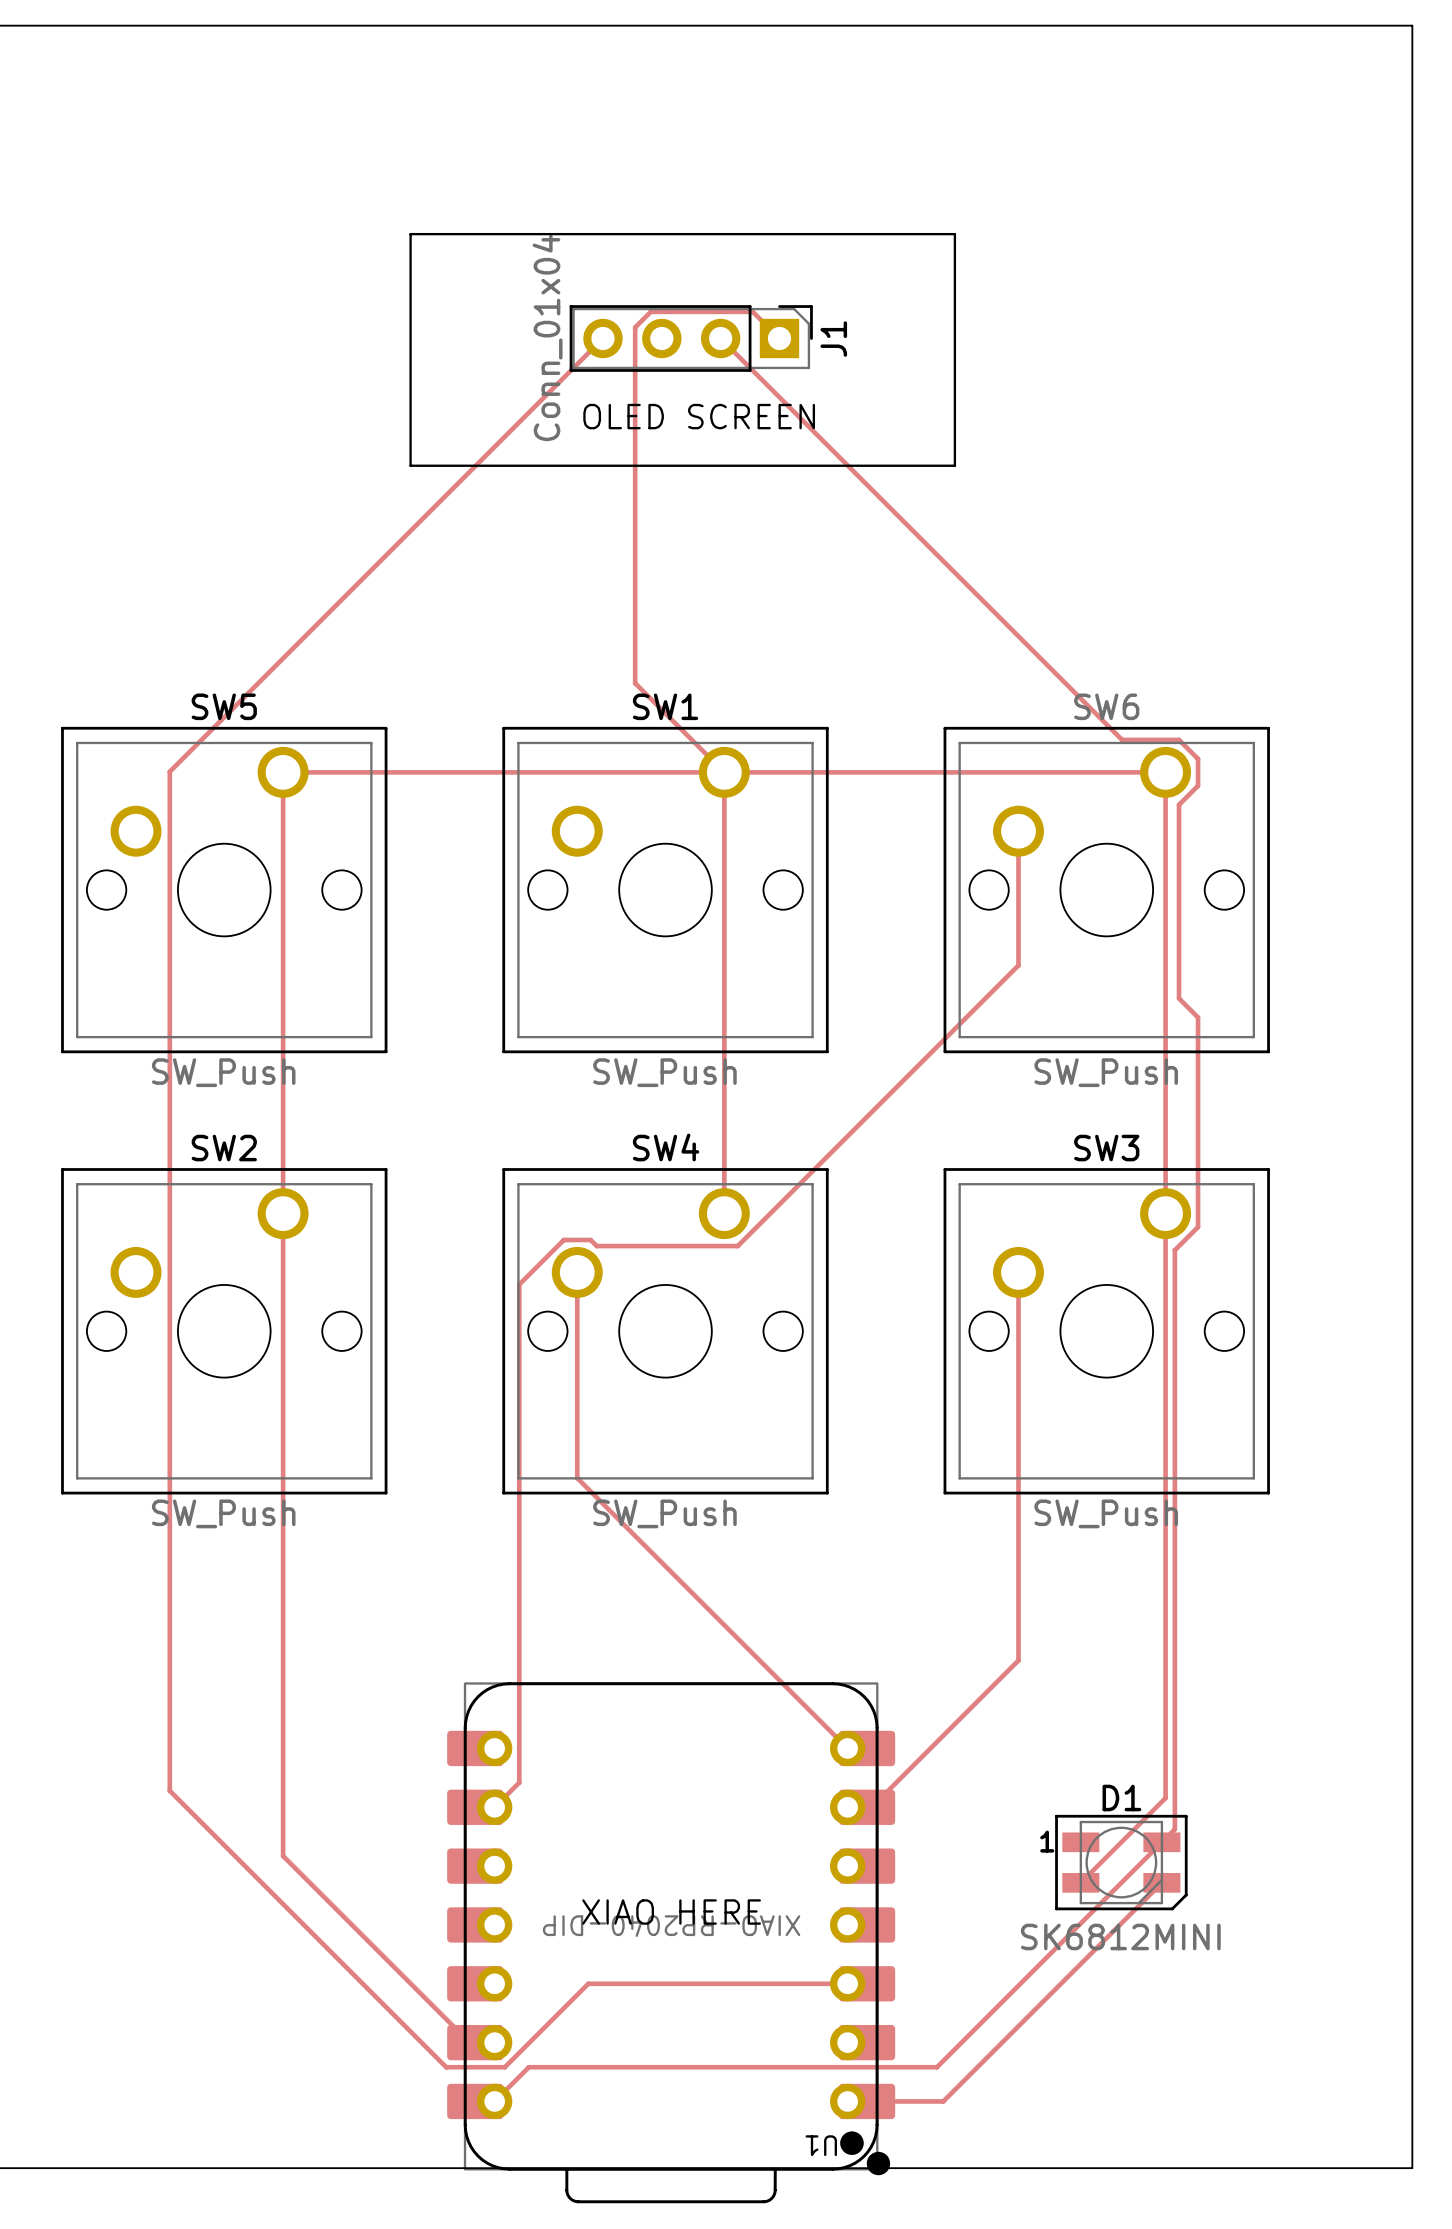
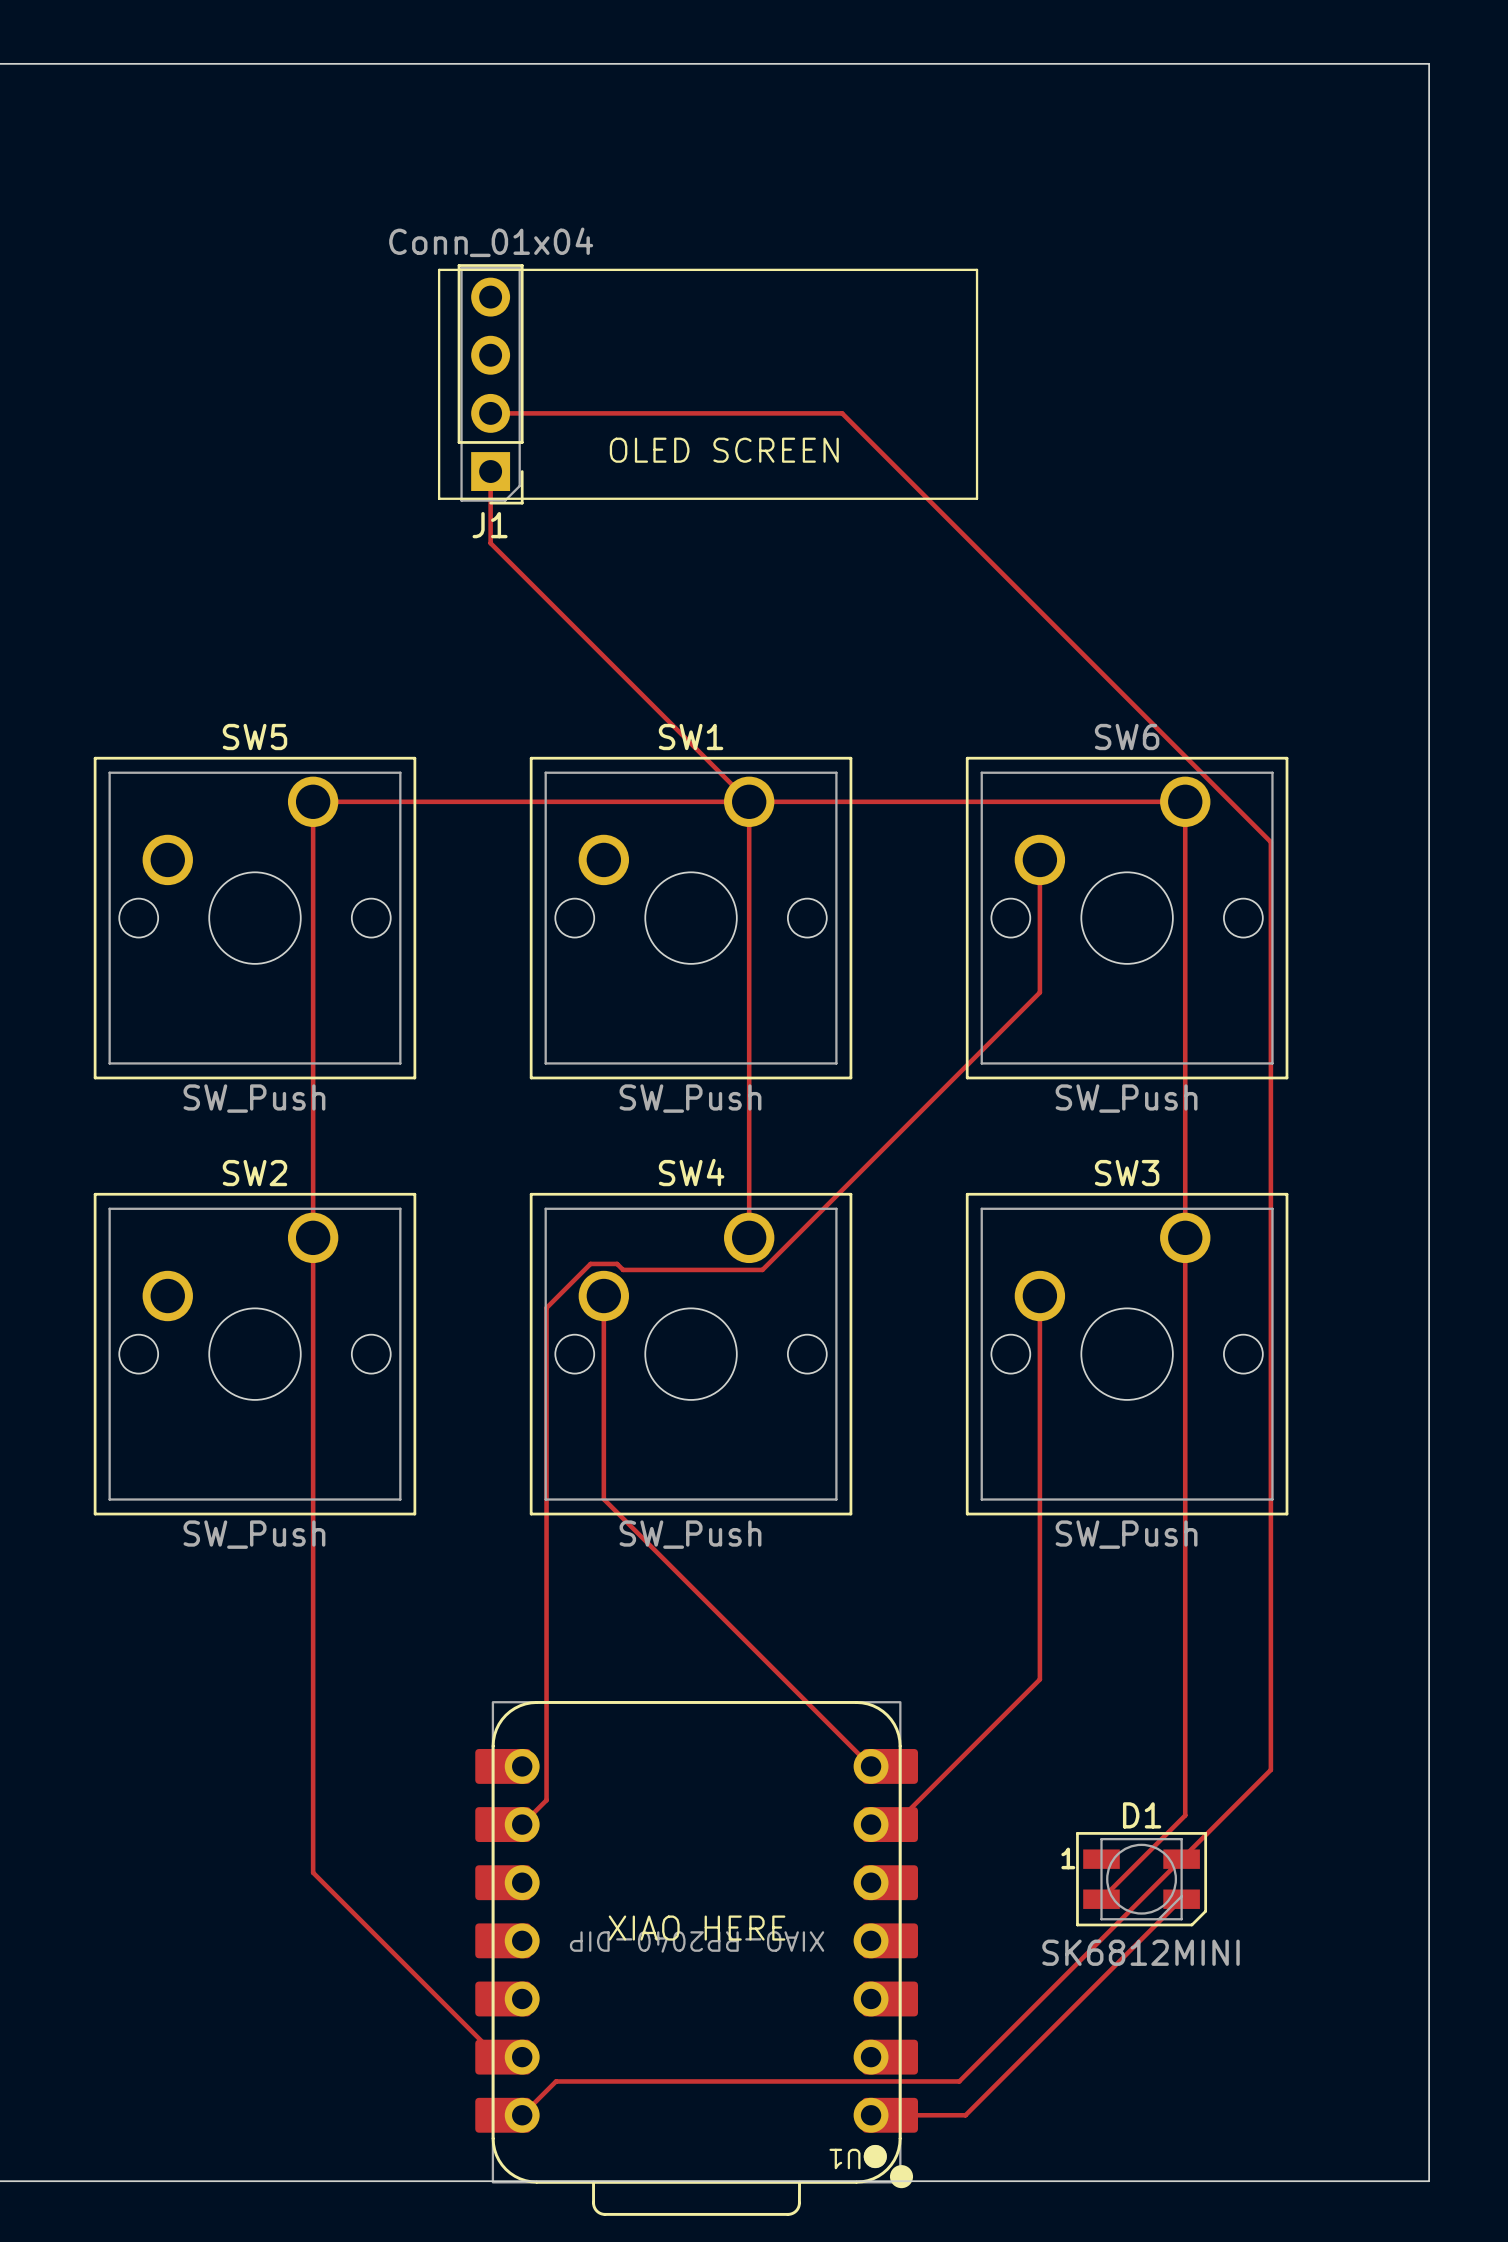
track: (603, 338) (169, 771) (169, 1790) (446, 2067) (504, 2067) (588, 1983) (847, 1983) -> none
J1 rotation: 0° (691, 338) -> 90° clockwise (490, 384)
J1 position: (691, 338) -> (490, 384)
track: (720, 338) (1122, 739) (1179, 739) -> (490, 413) (842, 413) (1198, 769)
track: (779, 338) (752, 311) (650, 311) (635, 327) (635, 683) -> (490, 471) (490, 543) (661, 713)
track: (1198, 758) (1198, 785) (1179, 804) (1179, 998) (1198, 1017) (1198, 1227) (1174, 1250) (1174, 1829) -> (1217, 788) (1270, 842) (1270, 1769) (1194, 1846)

